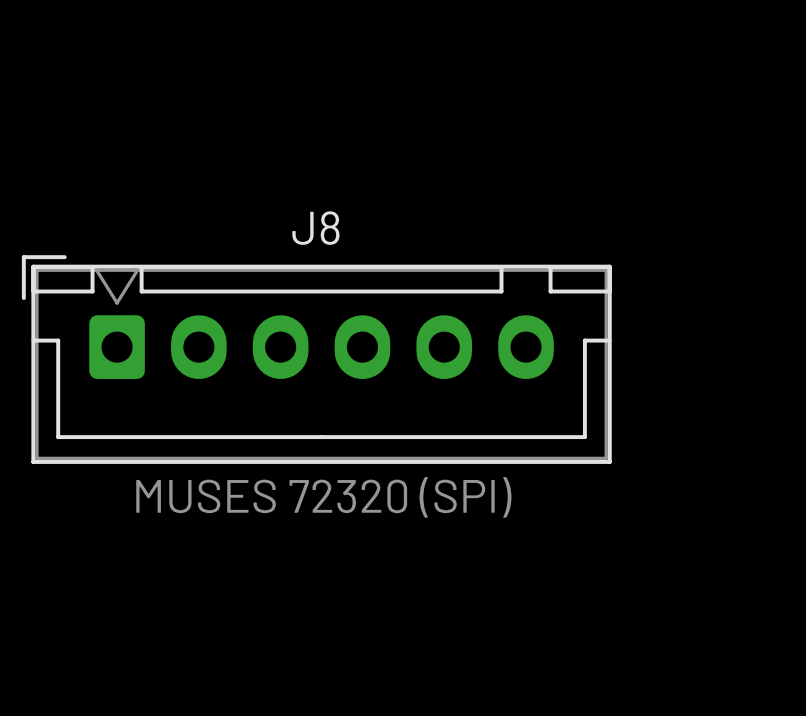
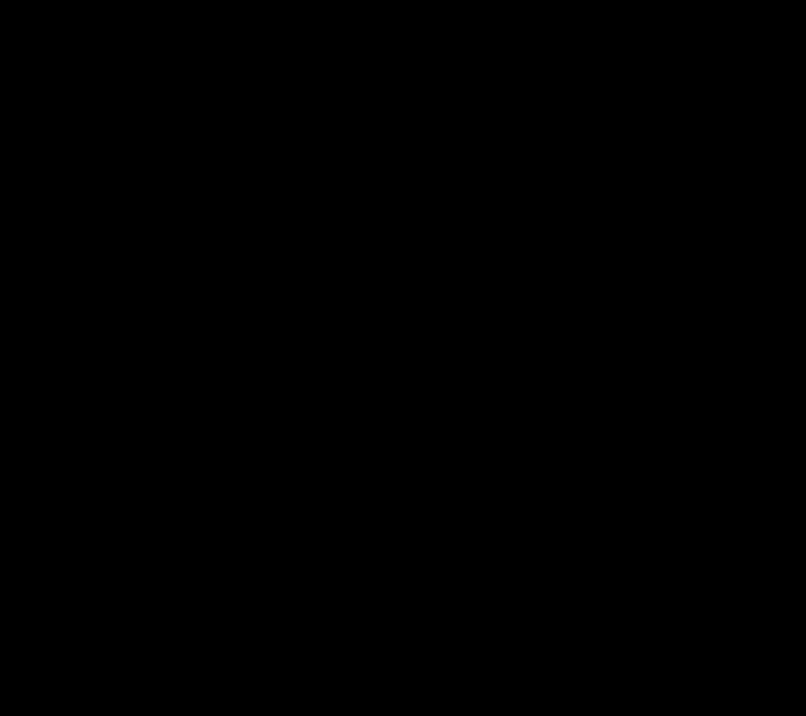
J8: MUSES 72320 (SPI) (316, 359) -> none

